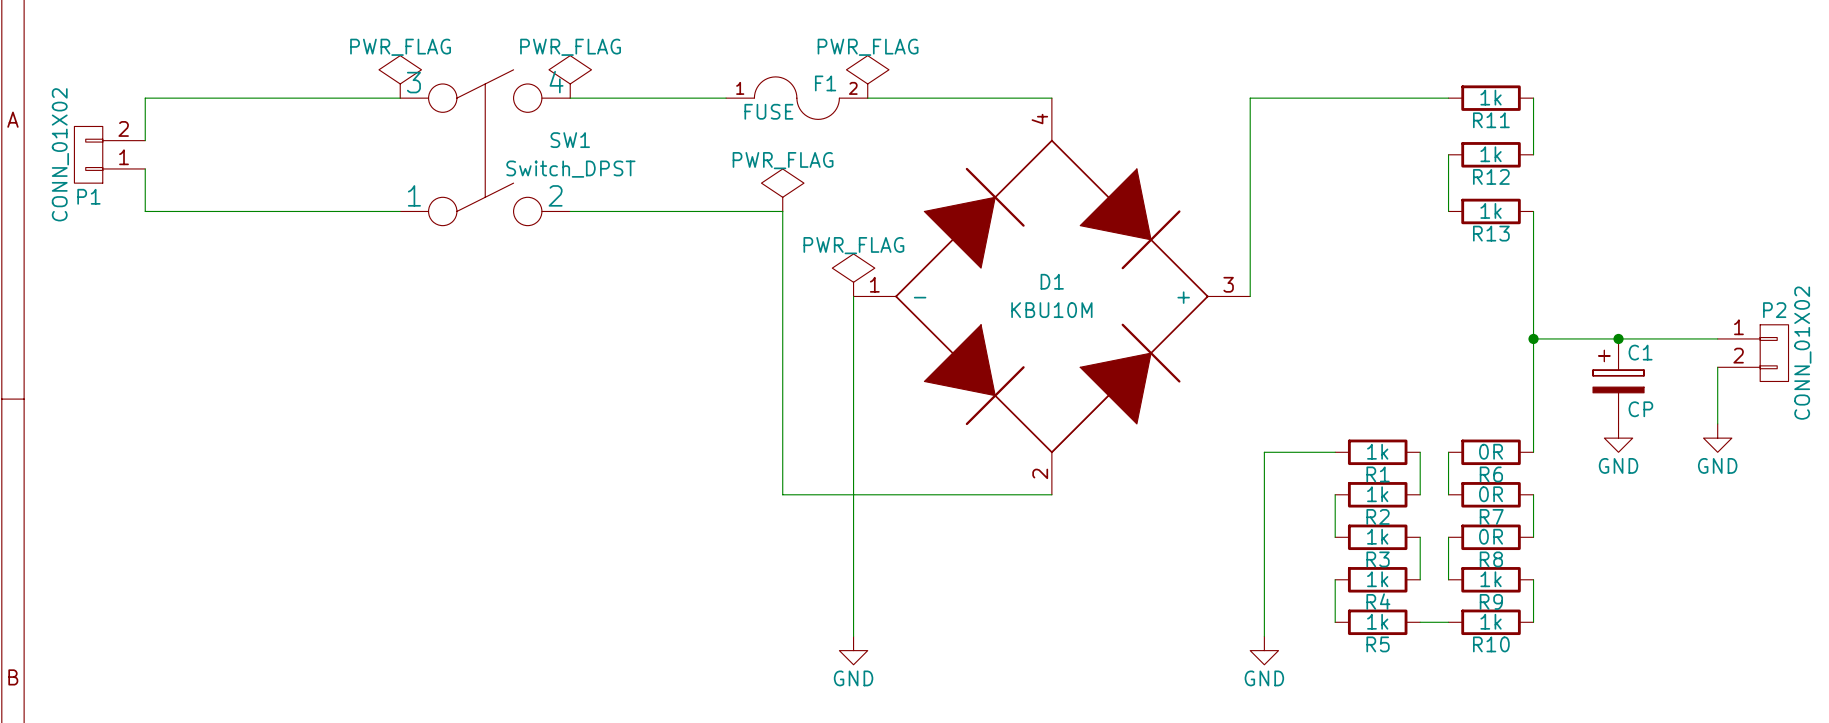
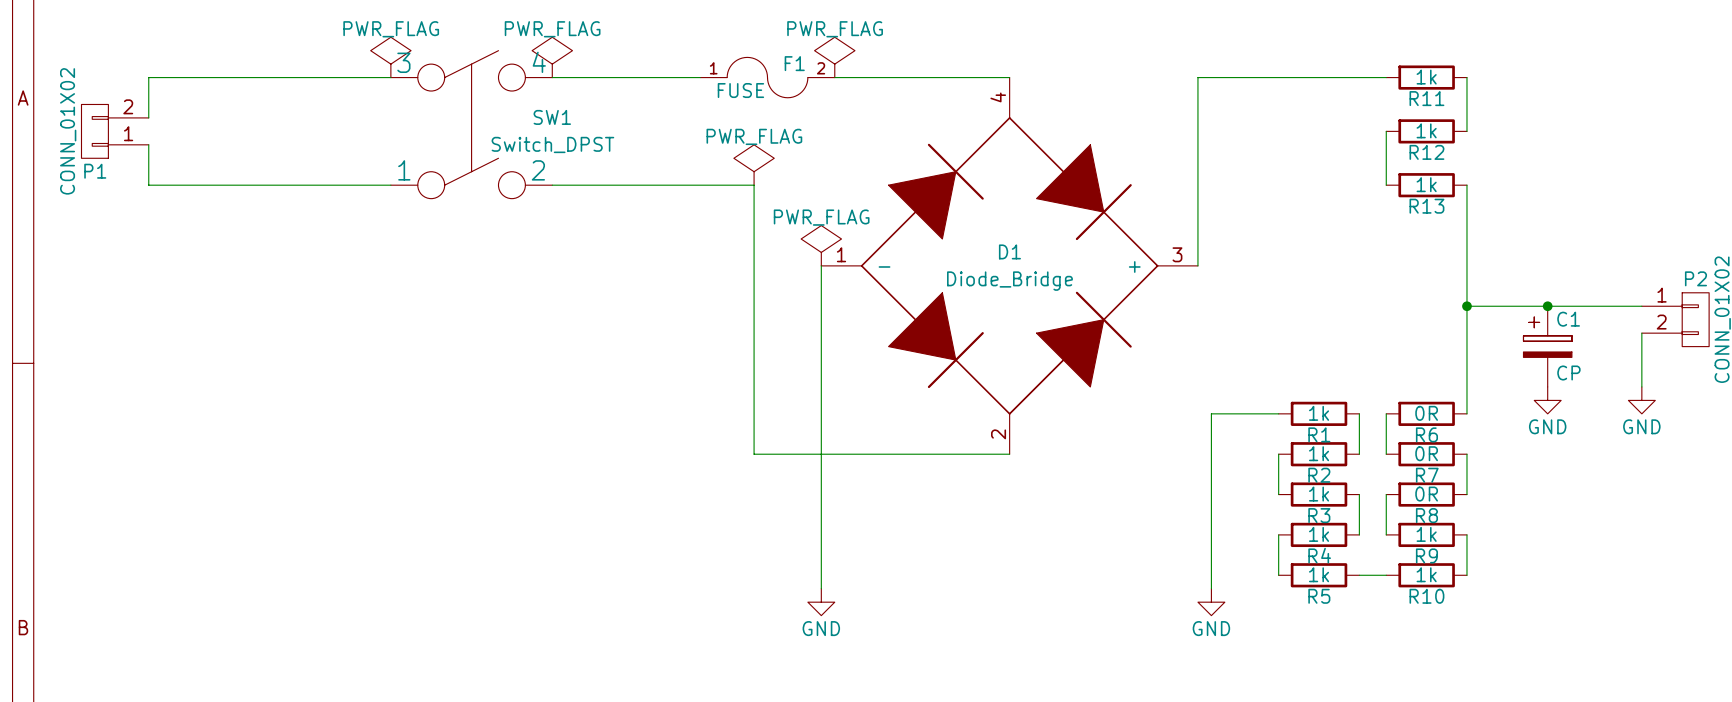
D1 value: KBU10M (1051, 310) -> Diode_Bridge (1009, 281)

